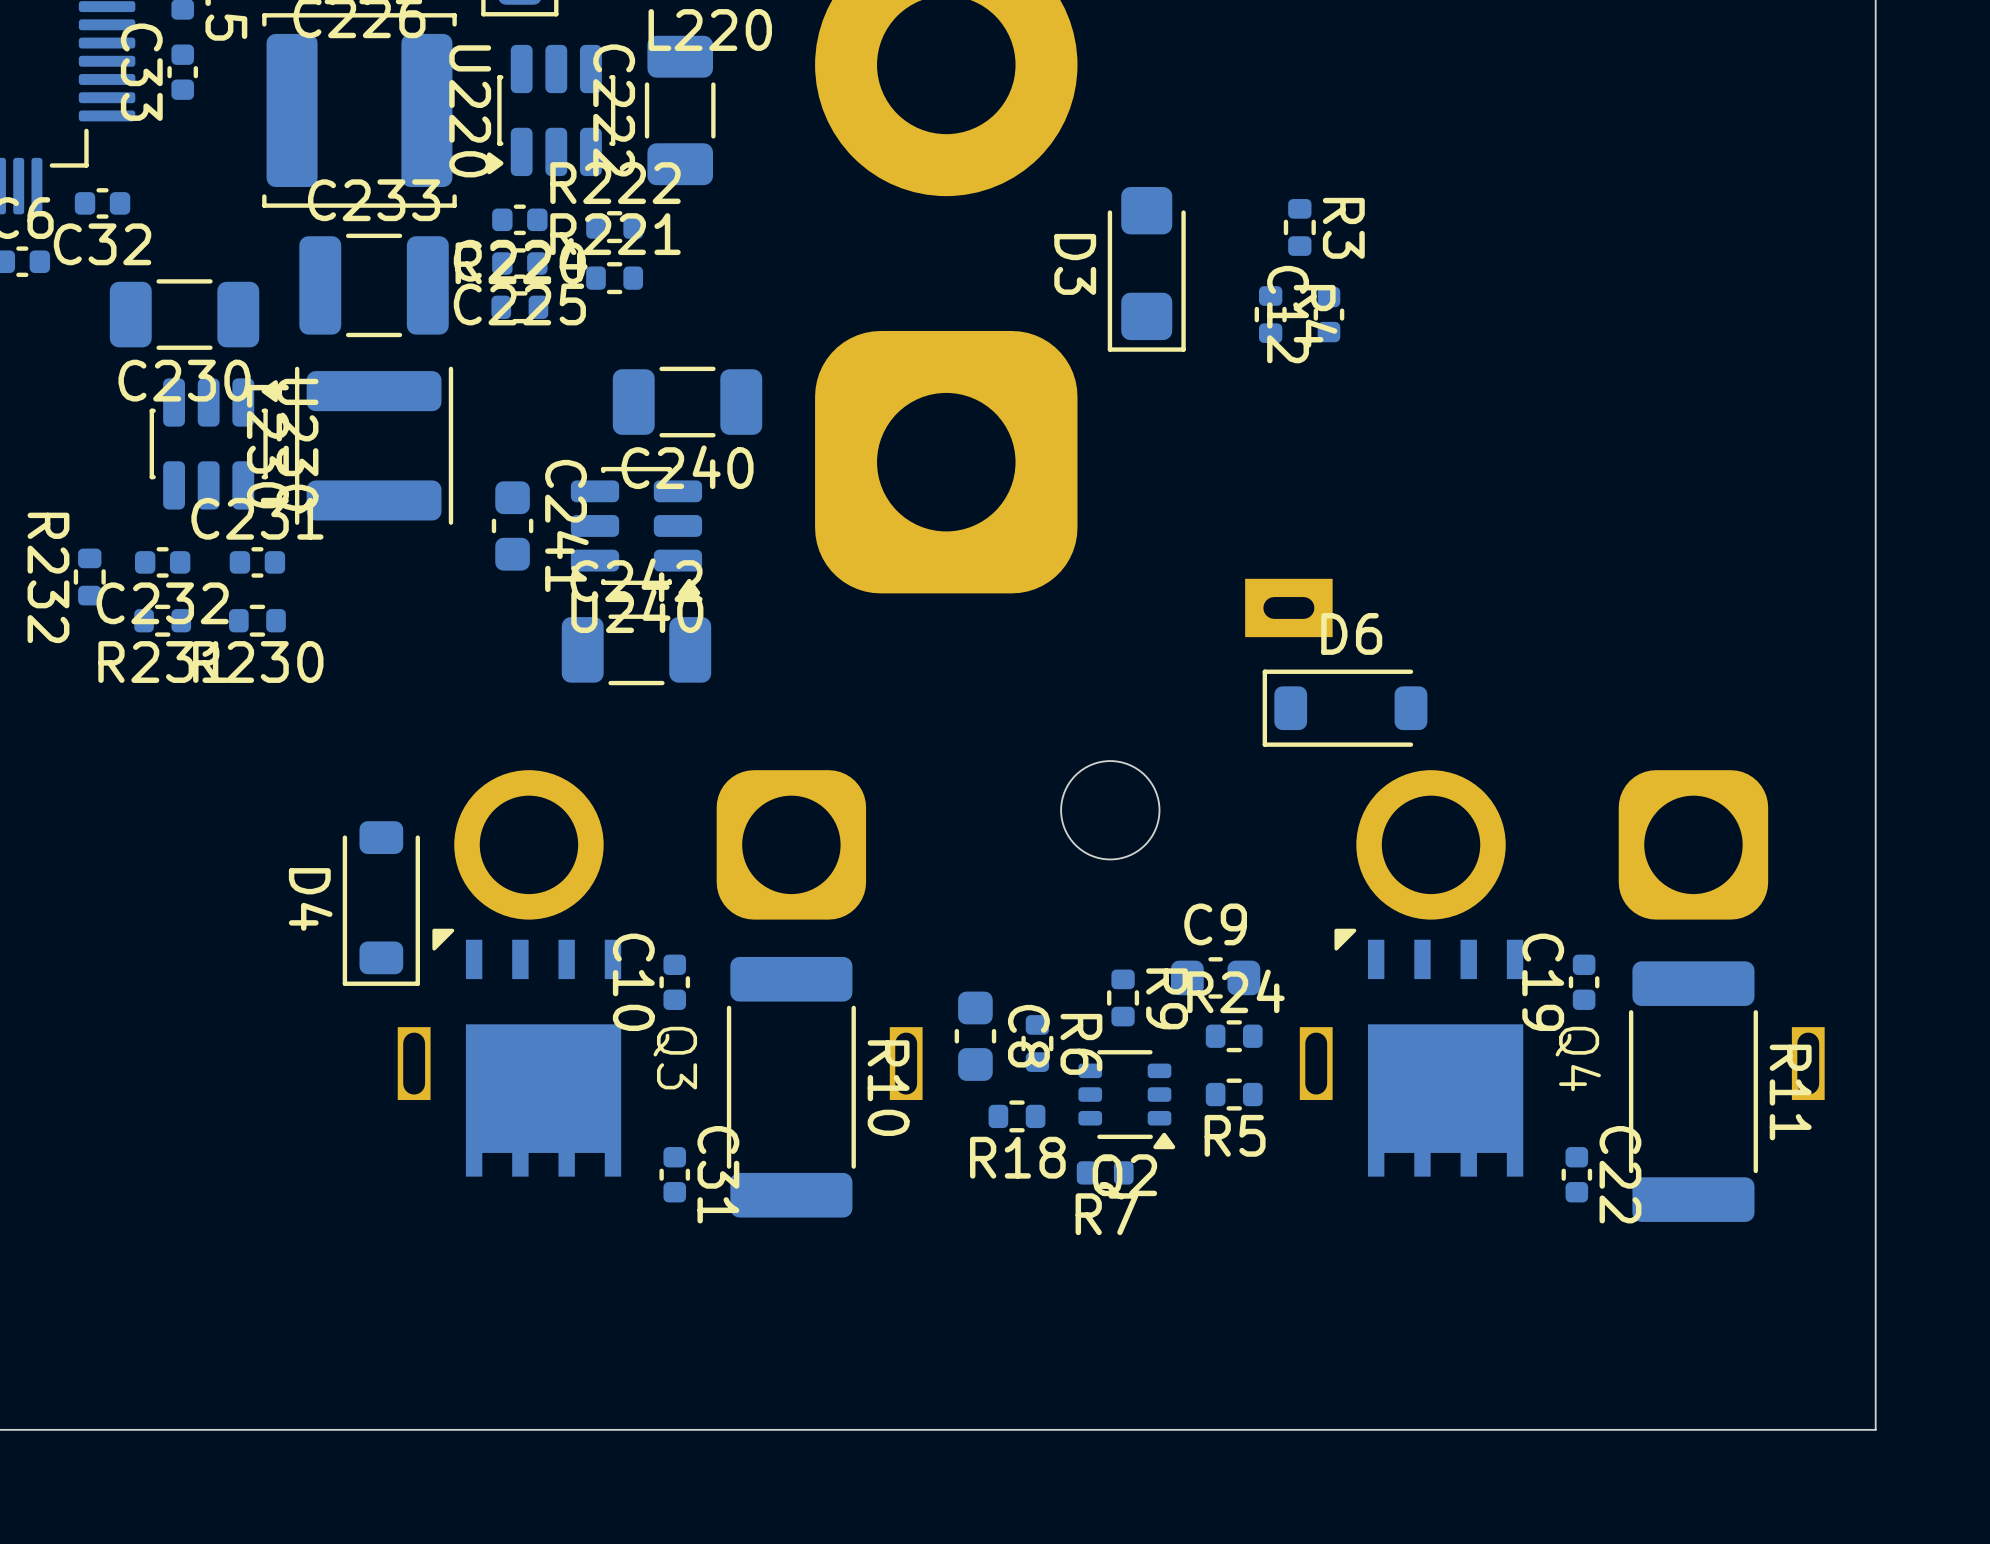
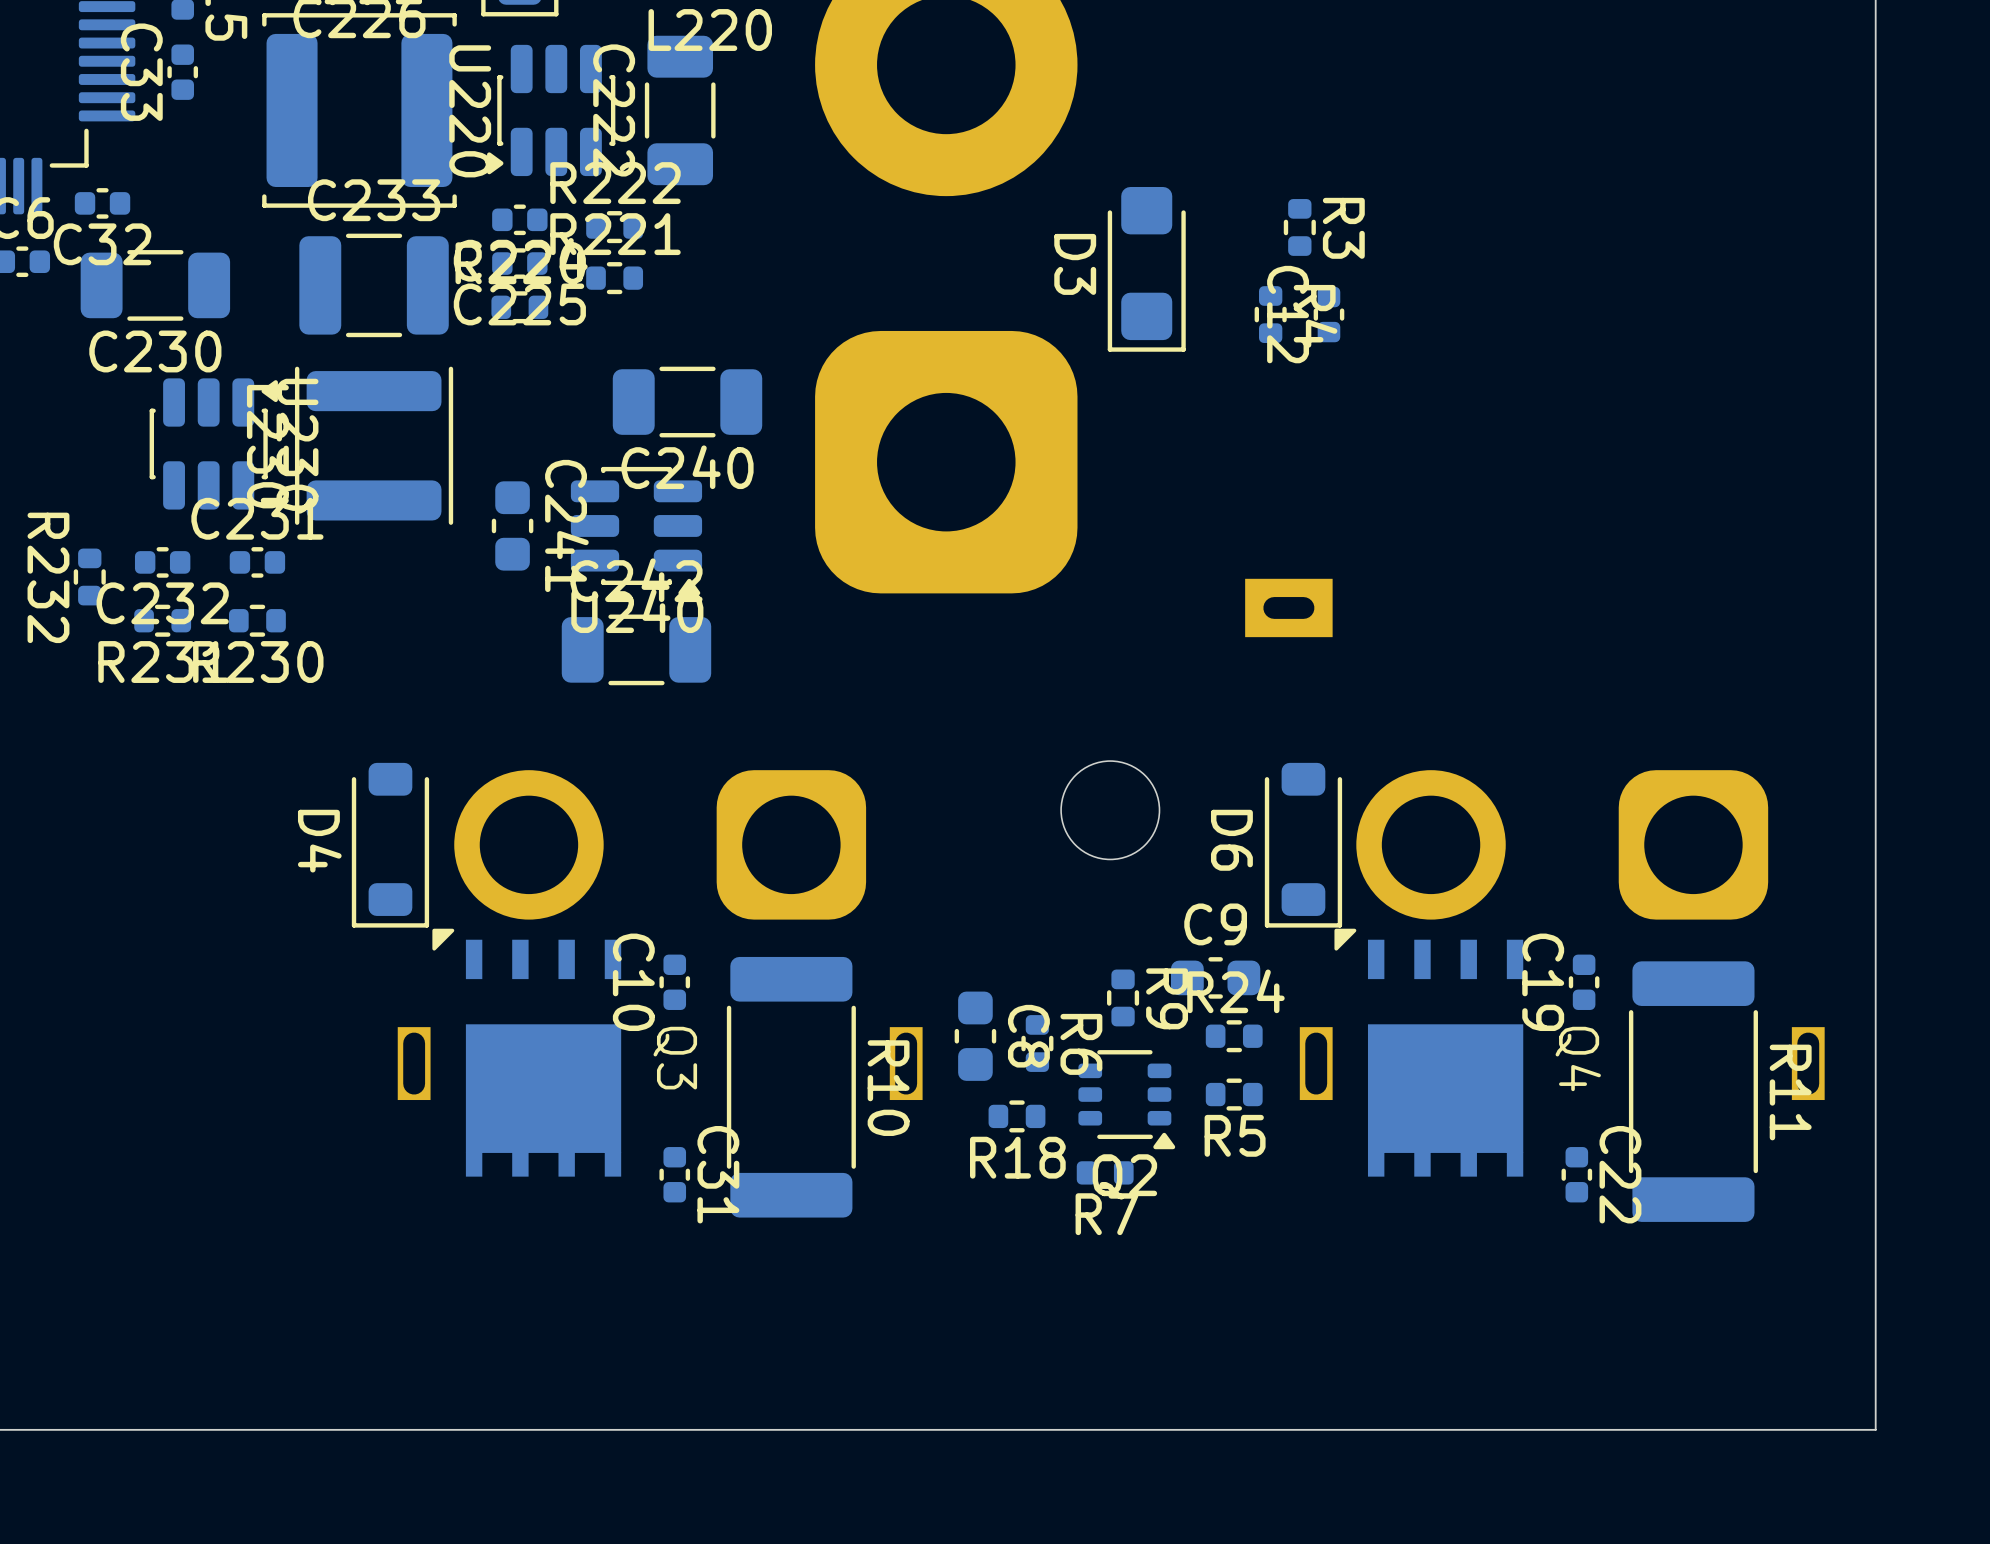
C230 position: (184, 314) -> (155, 285)
D6 rotation: 0° (1345, 708) -> 90° counterclockwise (1303, 845)
D6 position: (1345, 708) -> (1303, 845)
D4 position: (381, 903) -> (390, 845)

